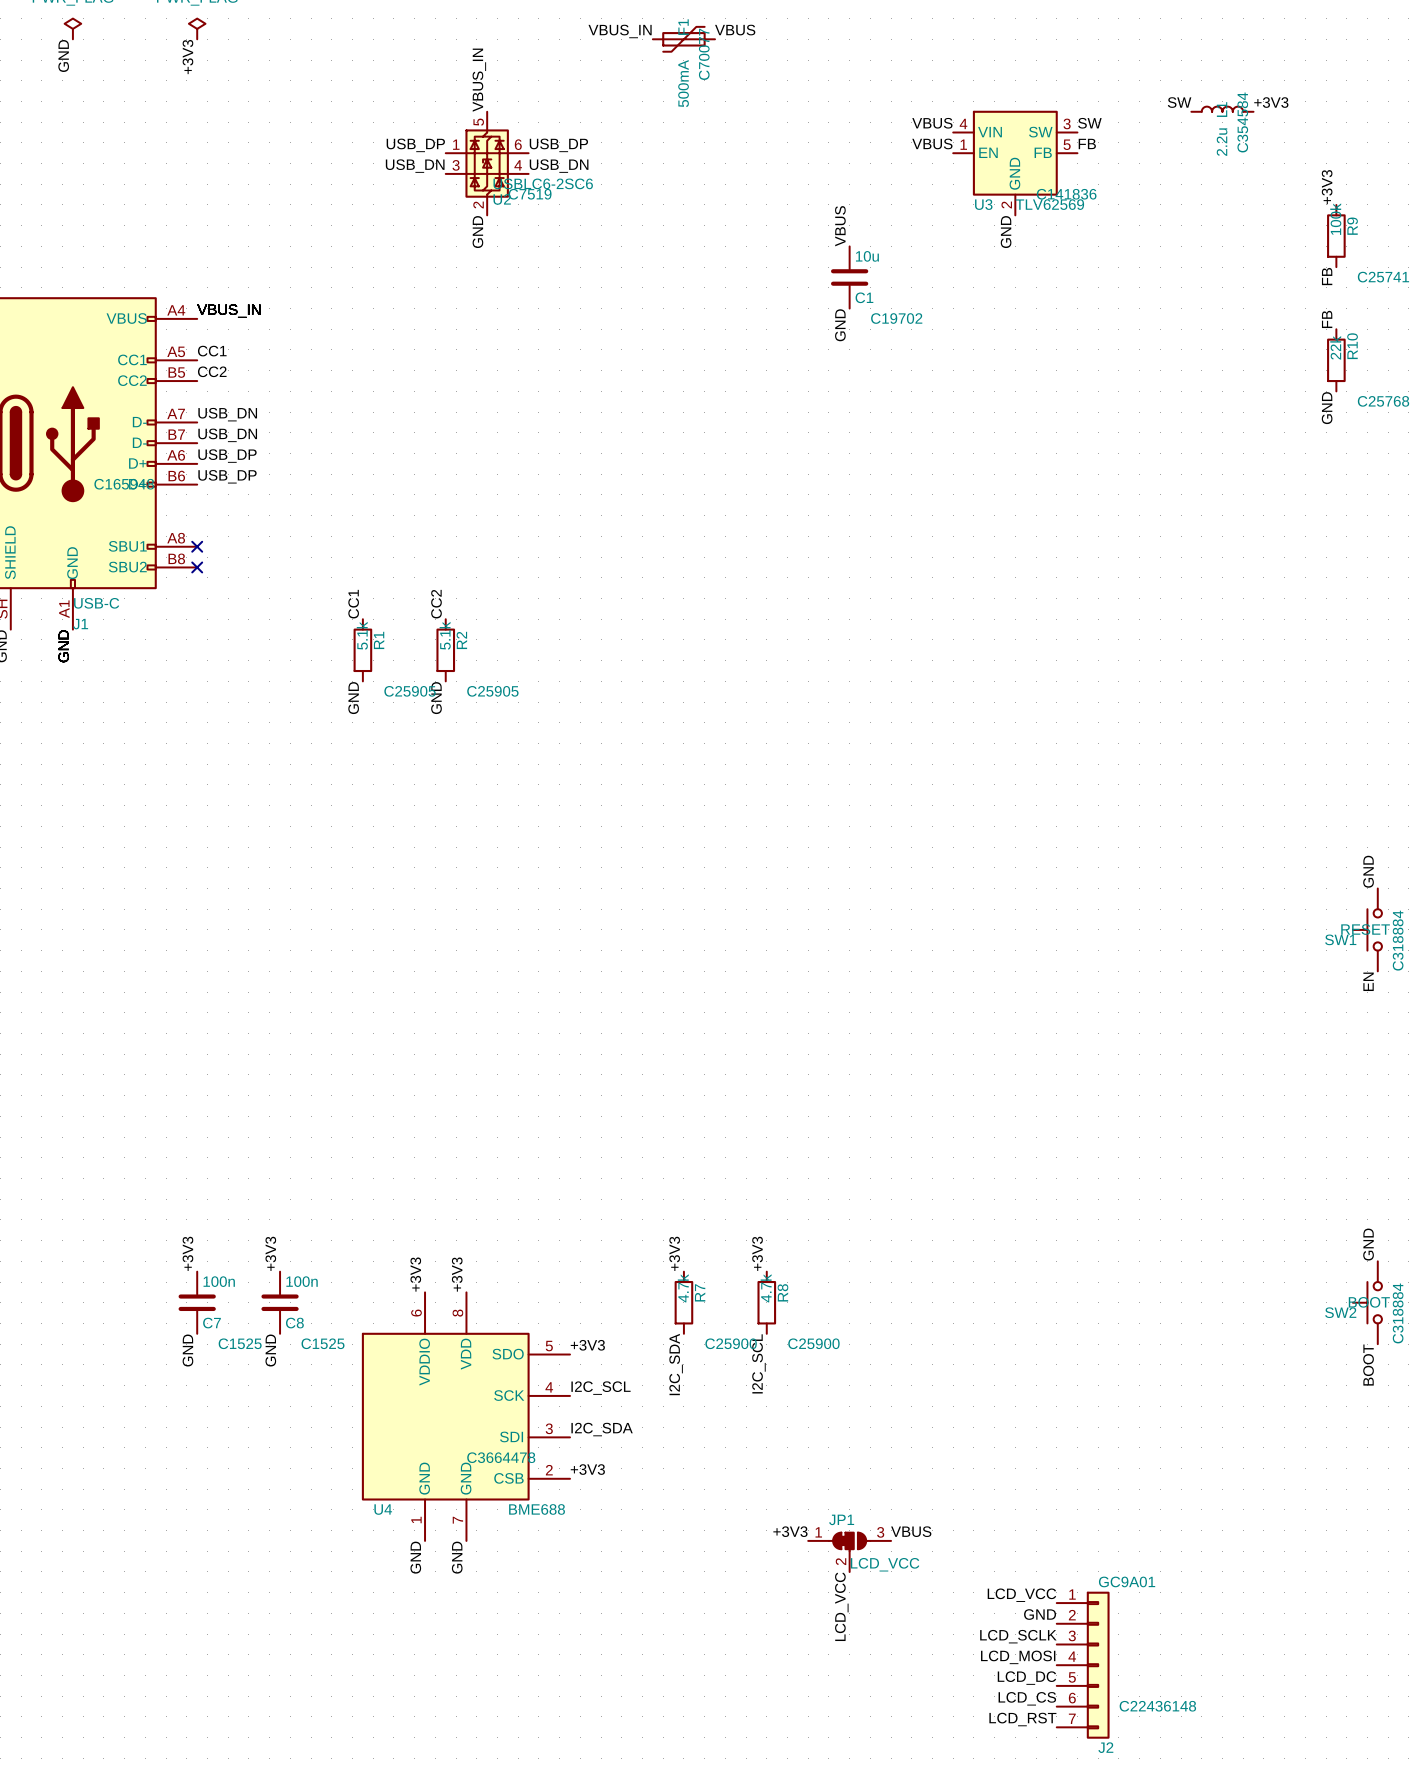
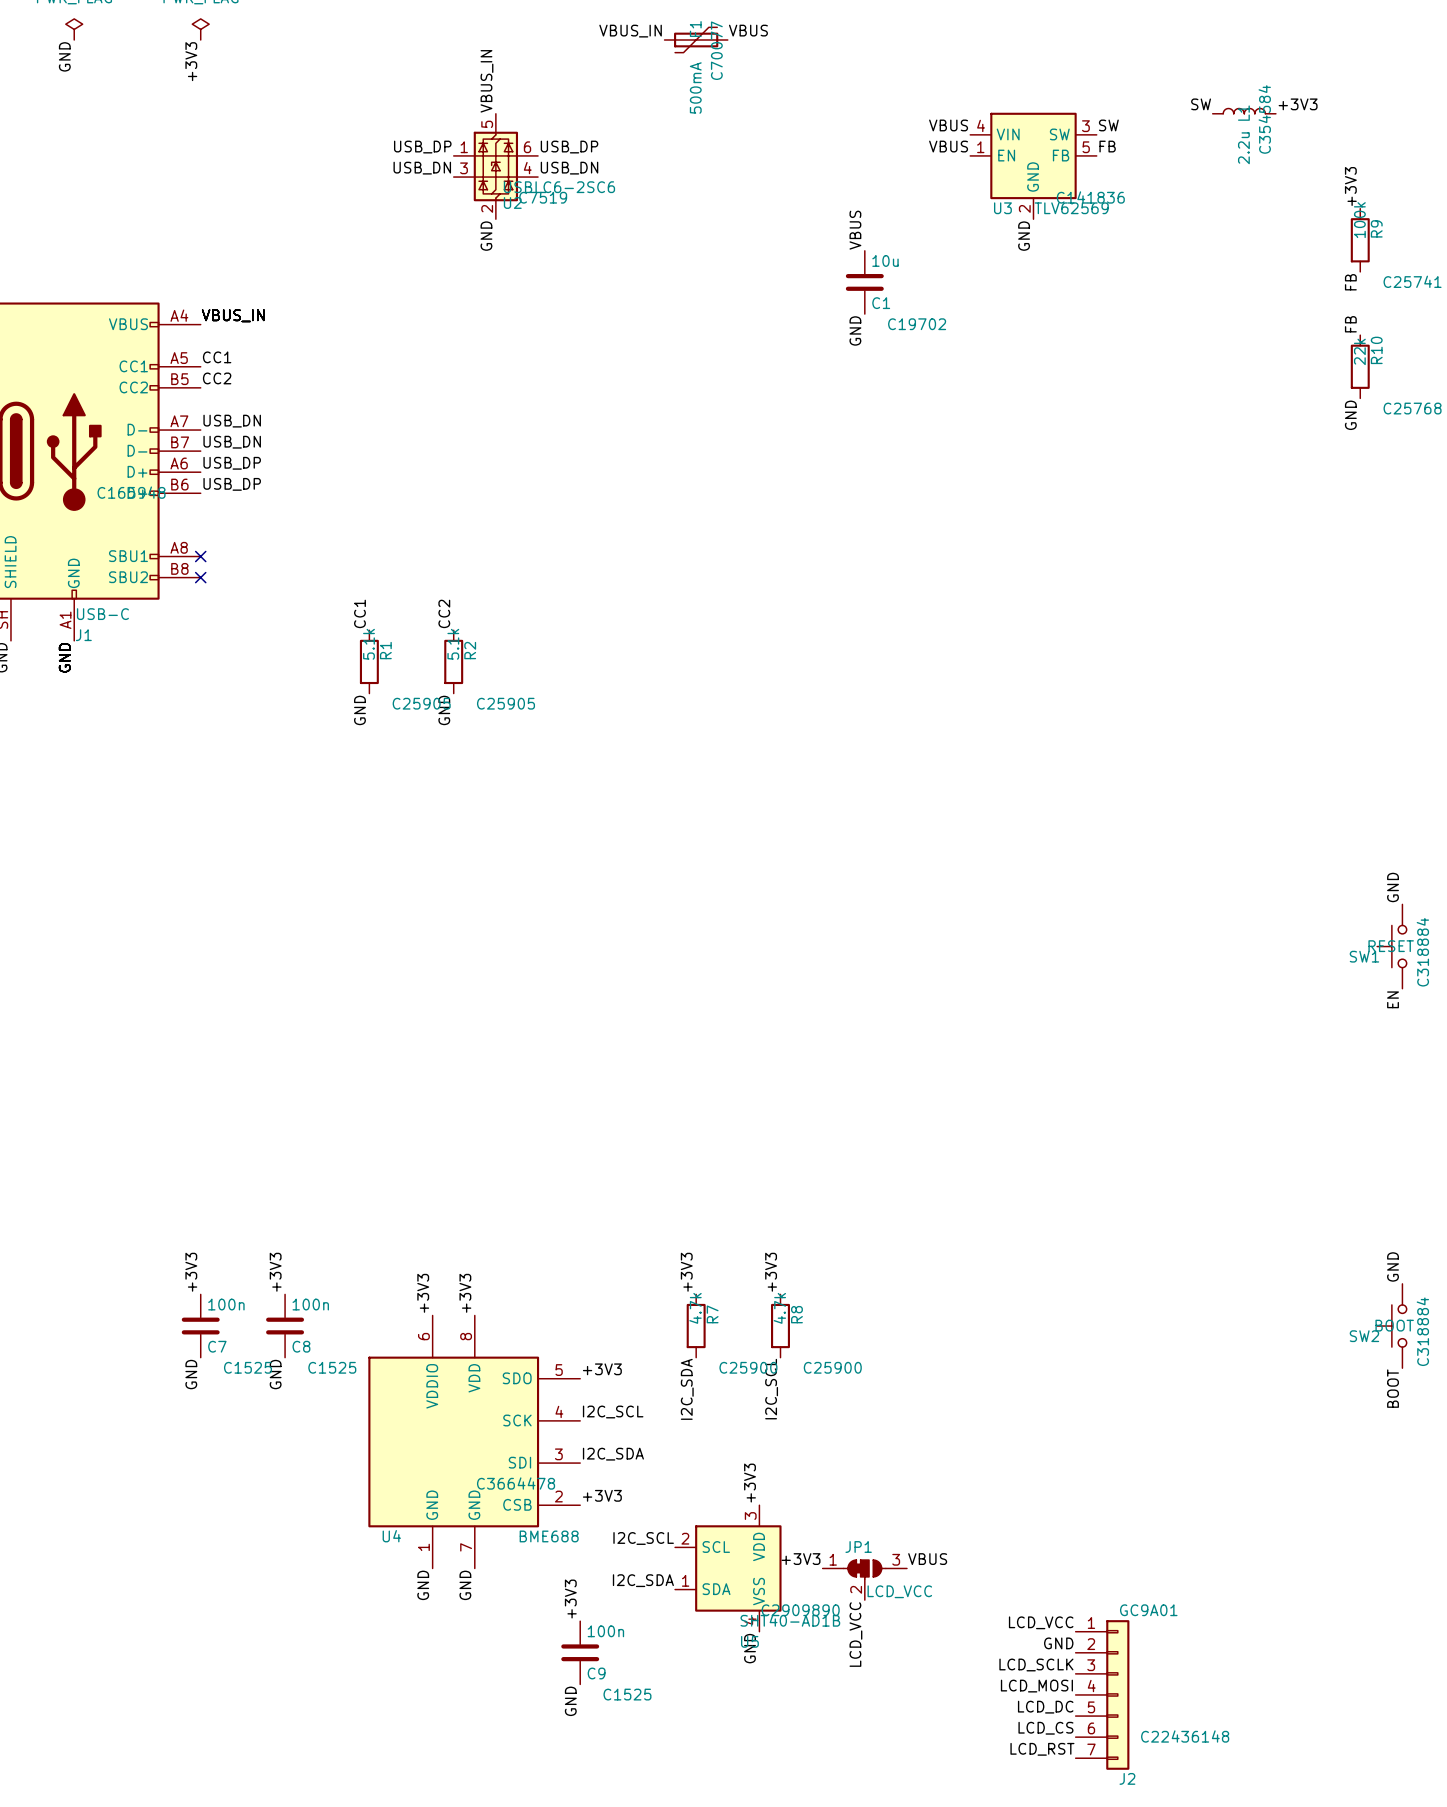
label: none -> +3V3 (750, 1483)
label: none -> I2C_SCL (643, 1538)
U5: none -> SHT40-AD1B (728, 1568)
label: none -> I2C_SDA (643, 1580)
label: none -> +3V3 (570, 1599)
label: none -> GND (750, 1648)
C9: none -> 100n (580, 1652)
label: none -> GND (570, 1701)

